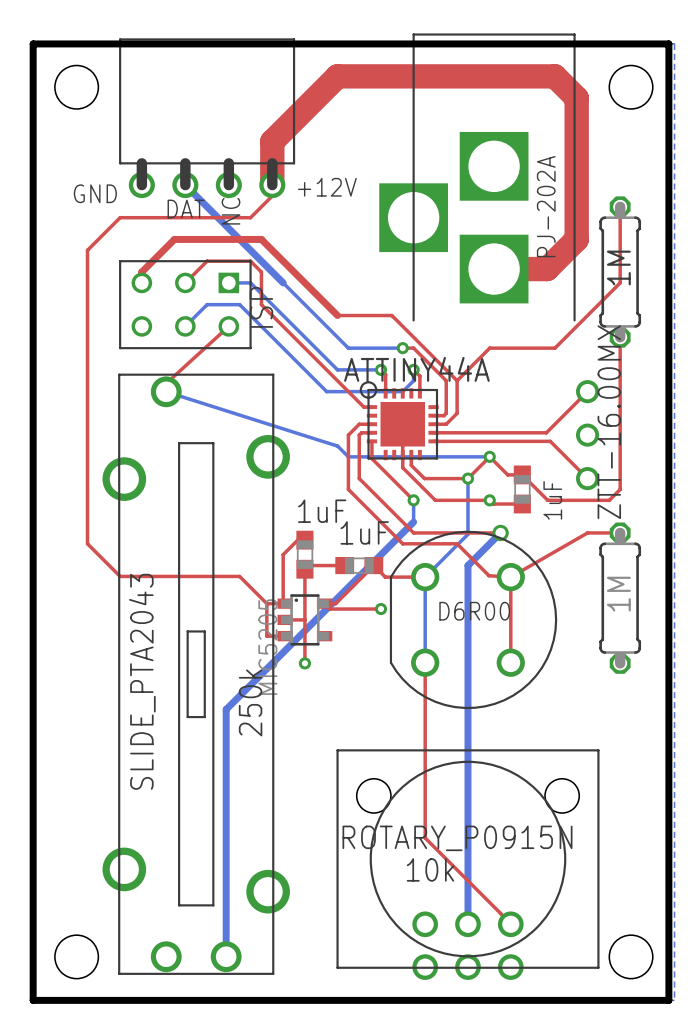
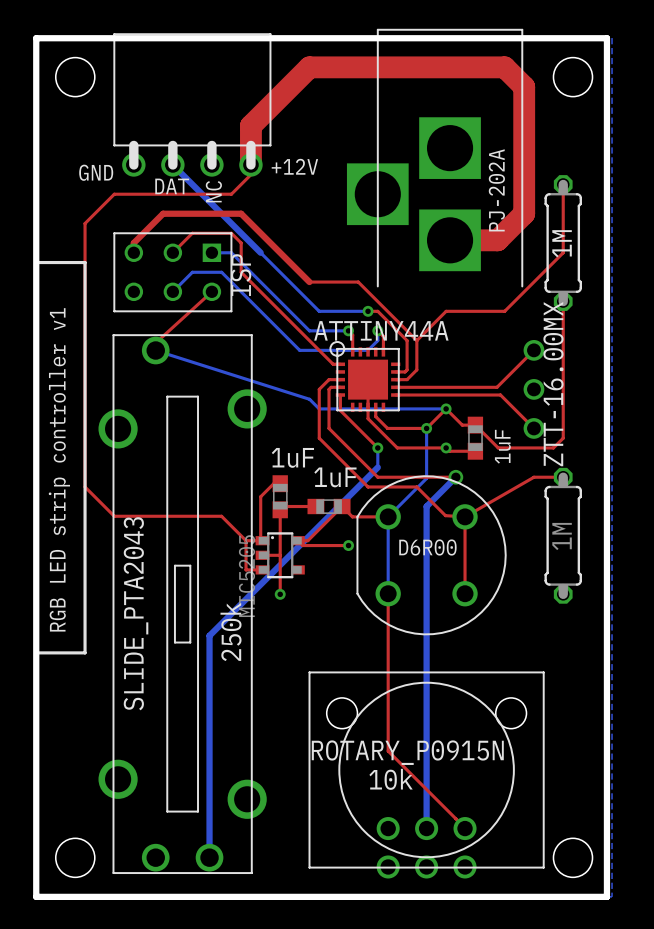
line: none -> (36, 262) (85, 262) (85, 652) (36, 652) (36, 262)
text: none -> RGB LED strip controller v1 (59, 469)

